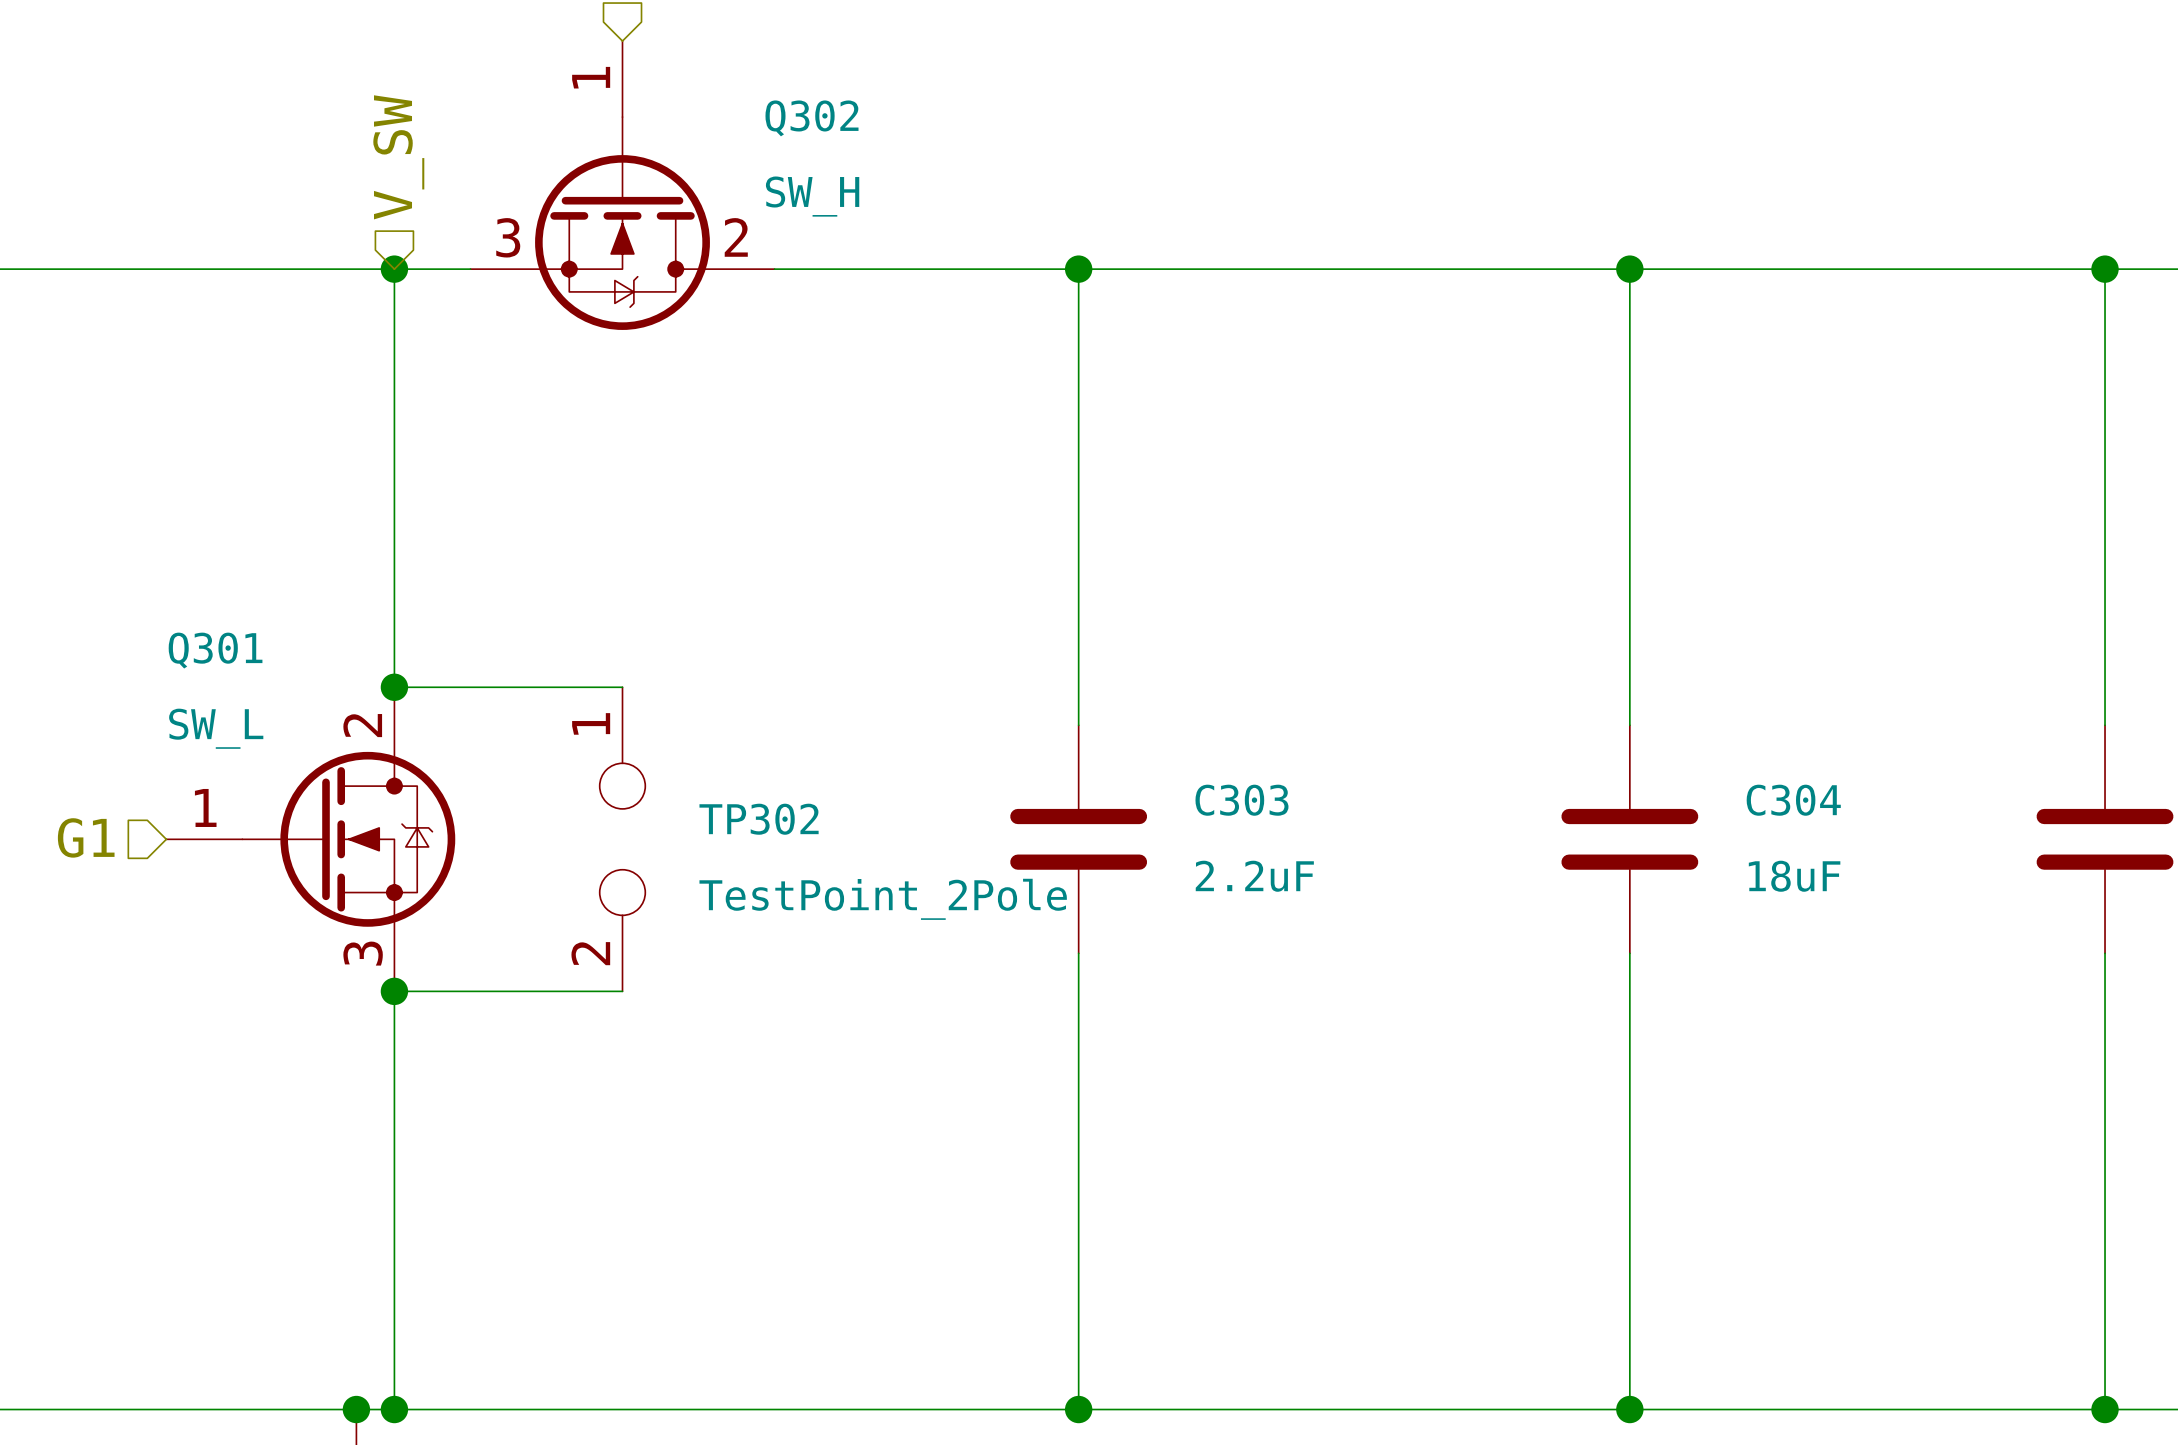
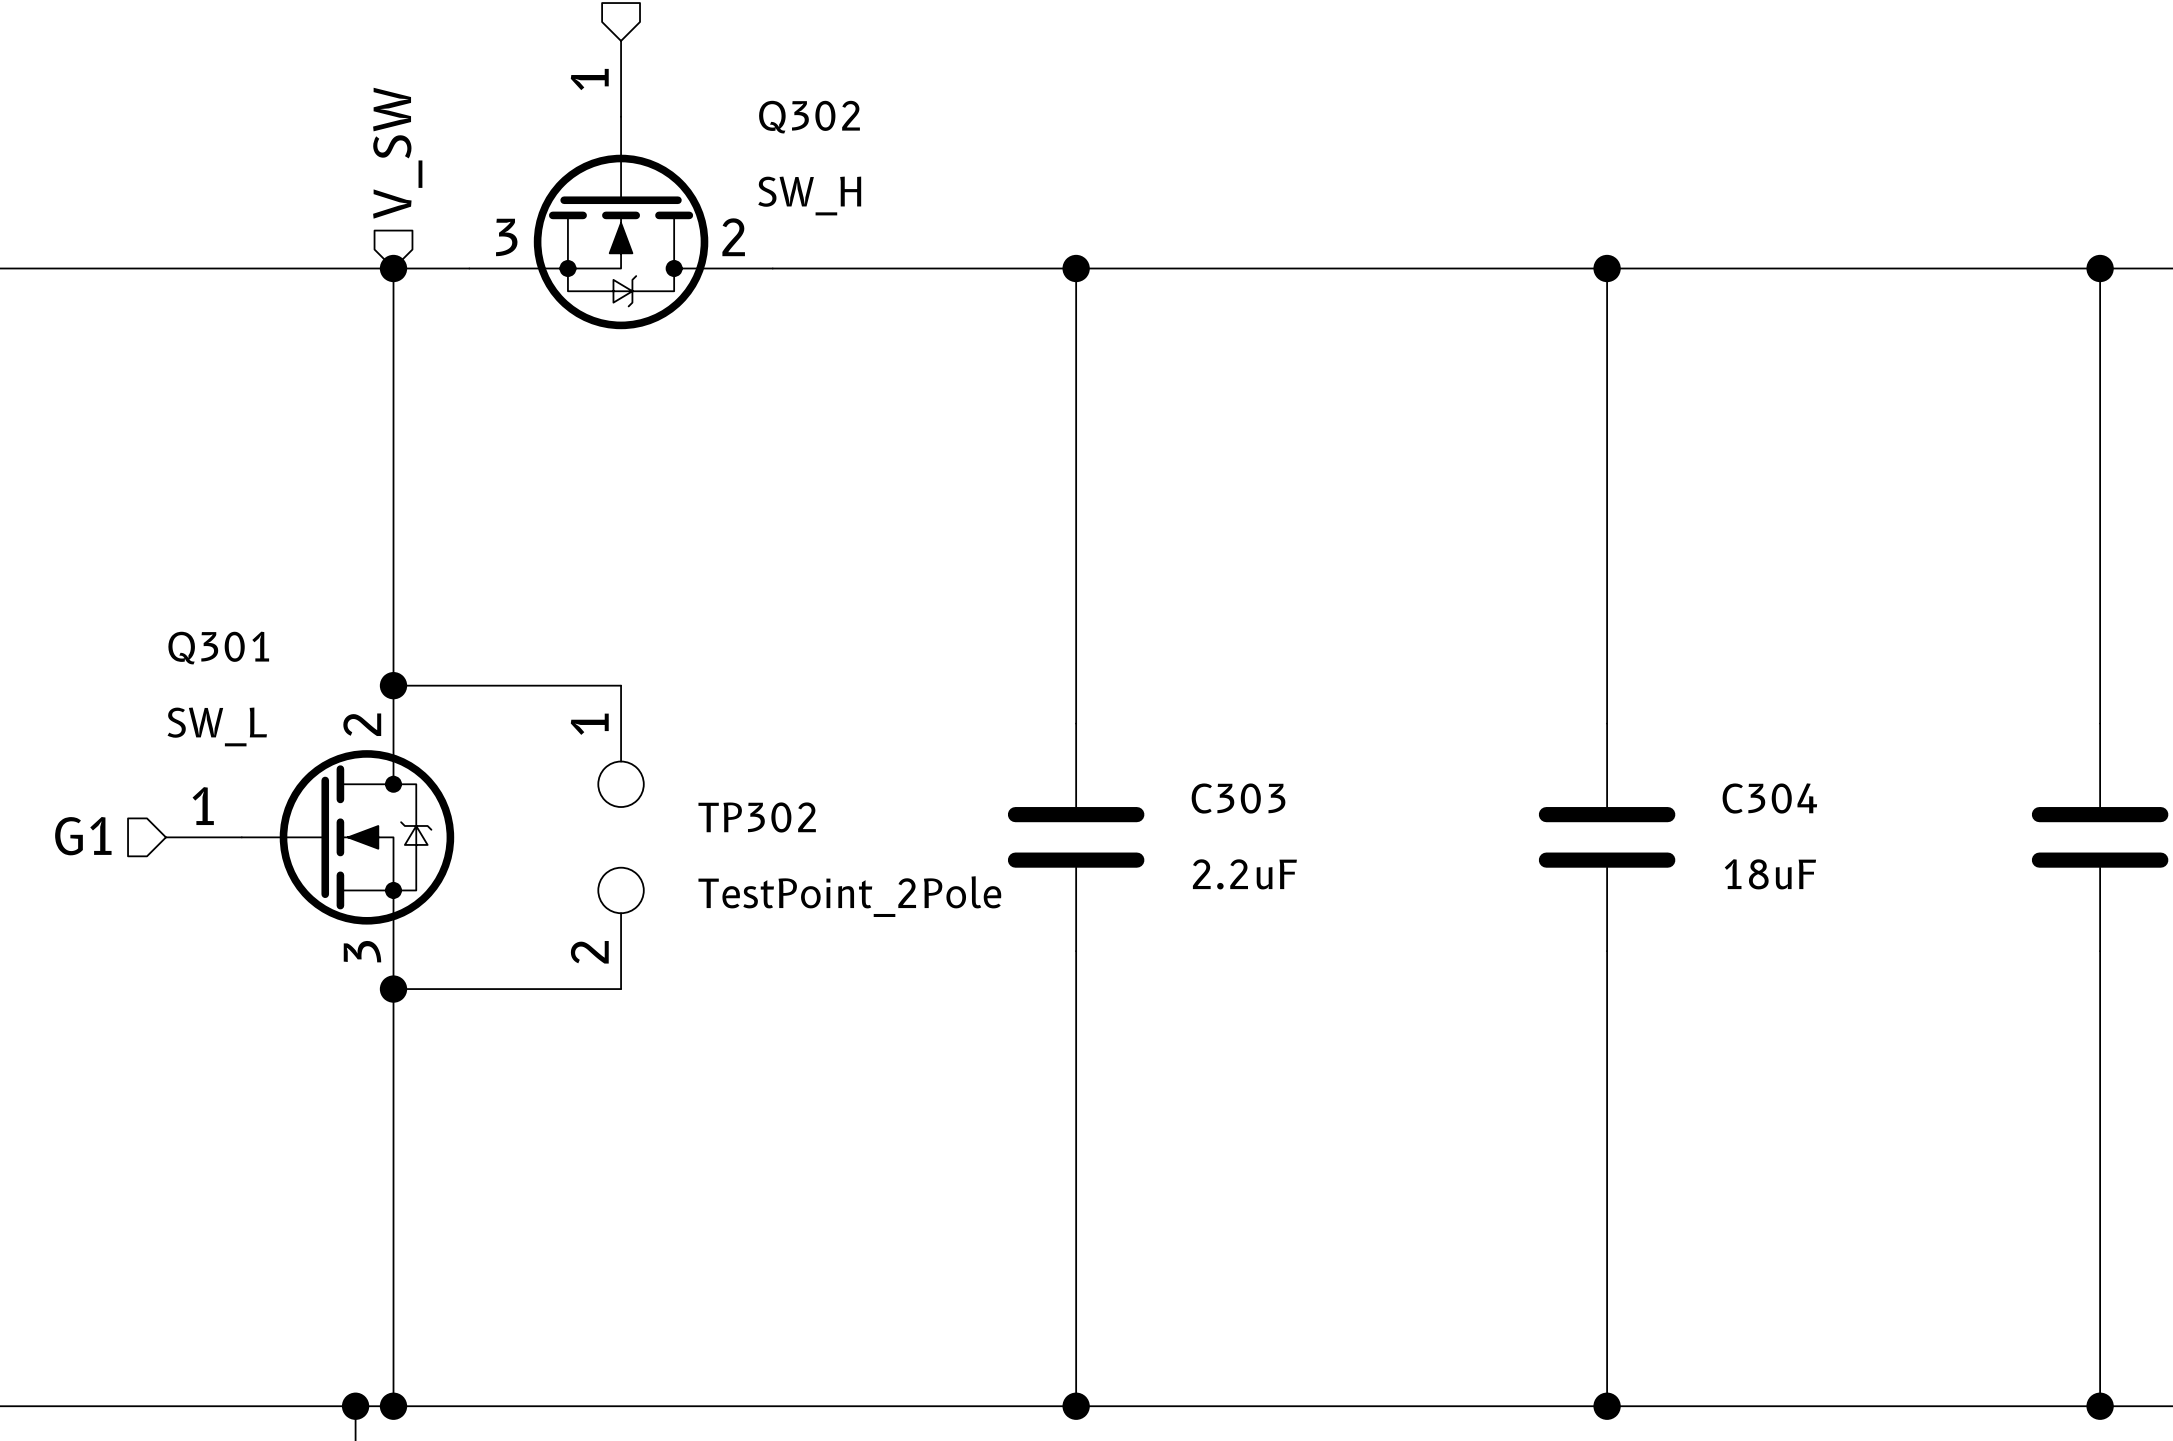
wire: (1629, 269) (1629, 725) -> (1607, 268) (1607, 723)
junction position: (1629, 269) -> (1607, 268)
C304 position: (1629, 839) -> (1607, 837)
wire: (1629, 953) (1629, 1409) -> (1607, 951) (1607, 1406)
junction position: (1629, 1409) -> (1607, 1406)

